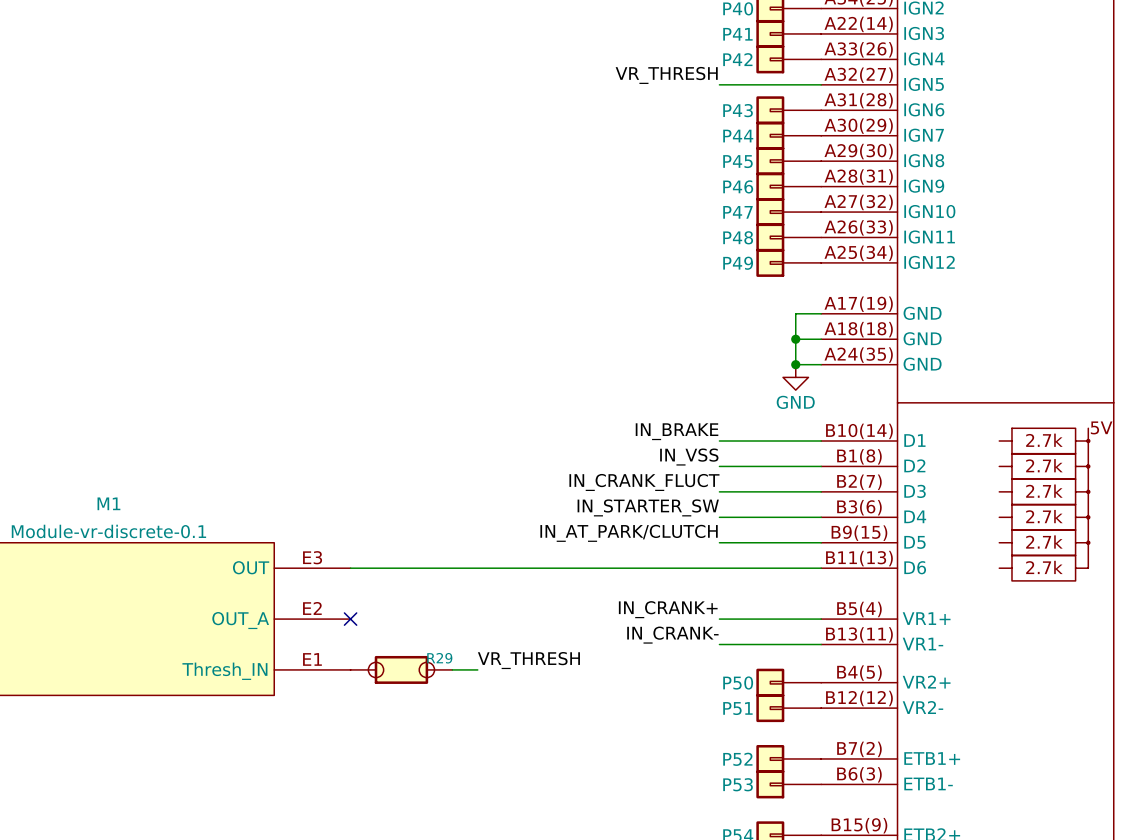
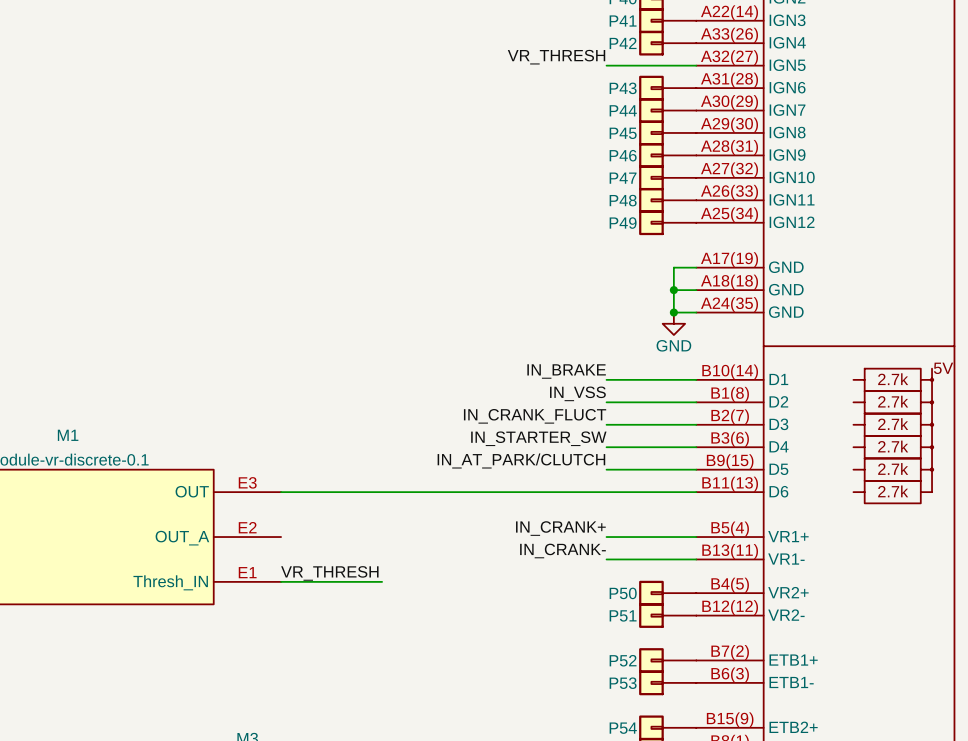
no-connect mark: (350, 619) -> none
label position: VR_THRESH (528, 660) -> VR_THRESH (329, 573)
R29: (401, 669) -> none
wire: (465, 669) (477, 669) -> none

